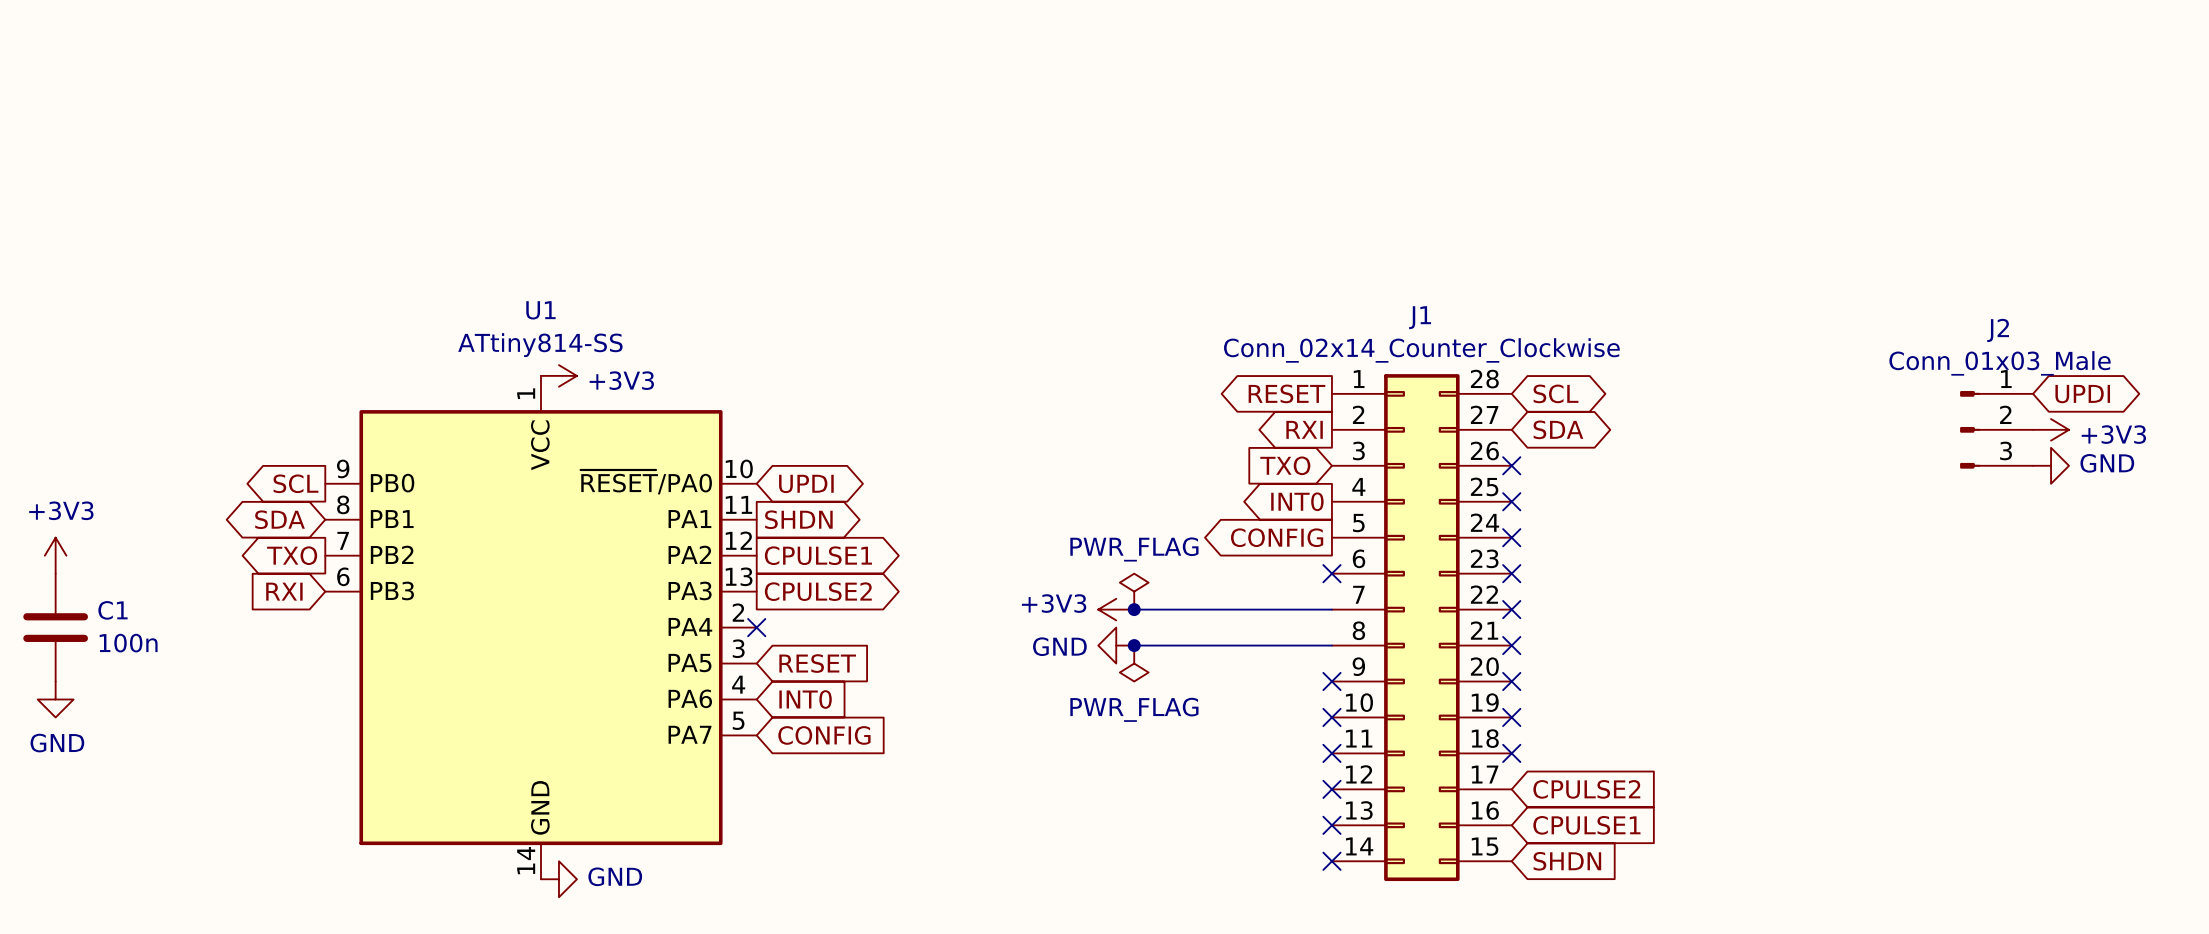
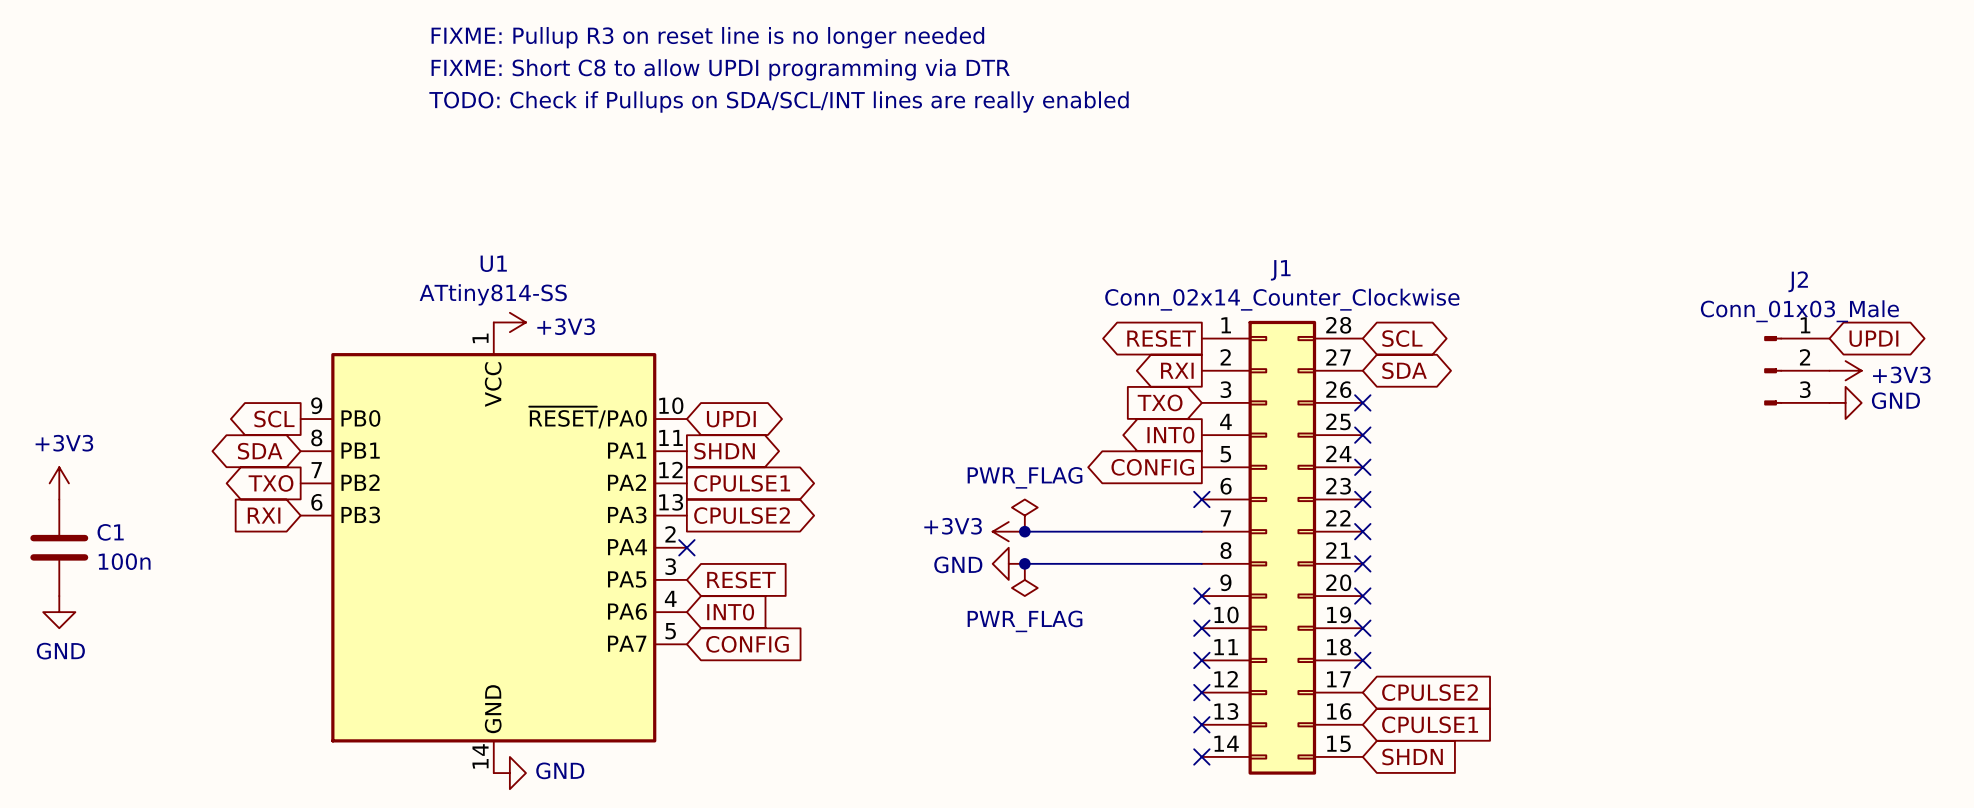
text: none -> FIXME: Pullup R3 on reset line is no longer needed (707, 37)
text: none -> FIXME: Short C8 to allow UPDI programming via DTR (720, 69)
text: none -> TODO: Check if Pullups on SDA/SCL/INT lines are really enabled (779, 102)

